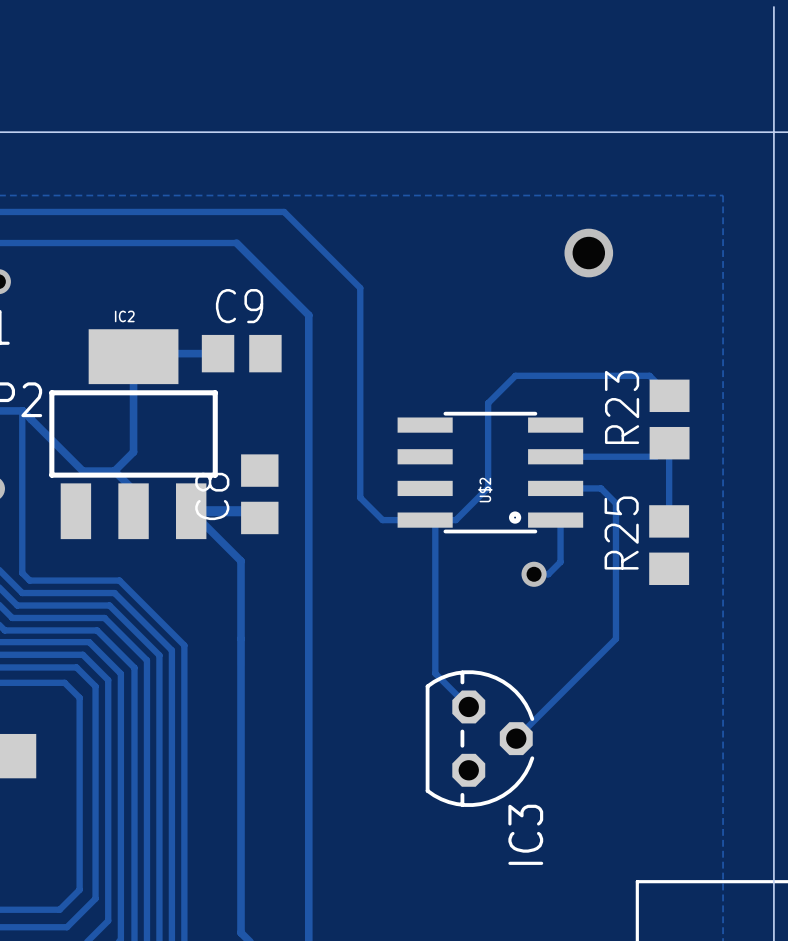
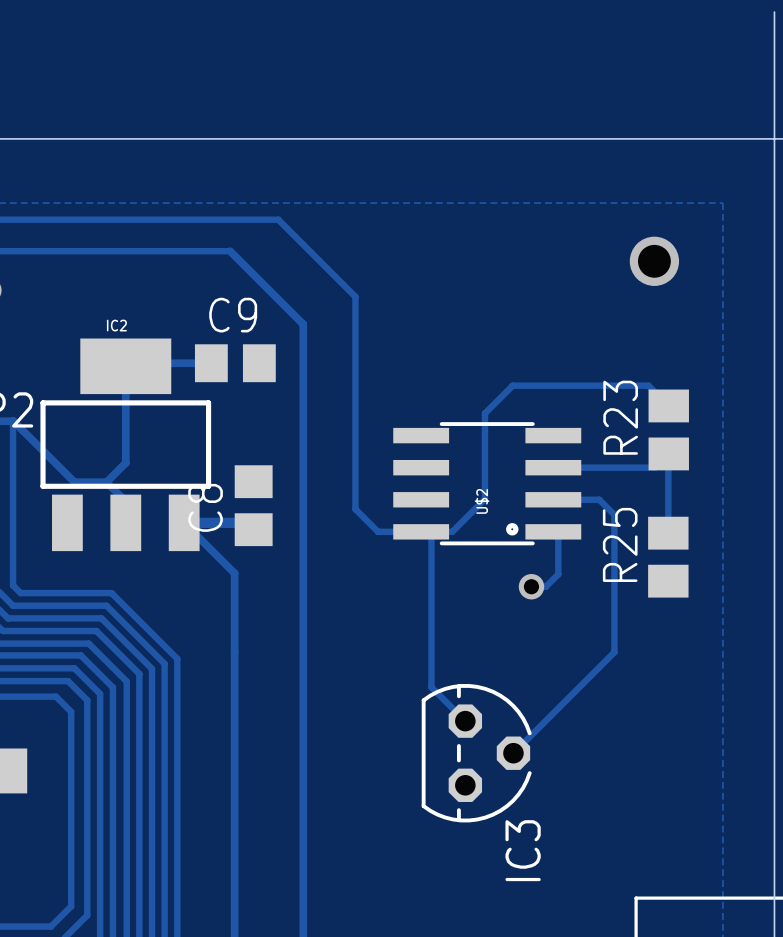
via position: (588, 253) -> (654, 261)

